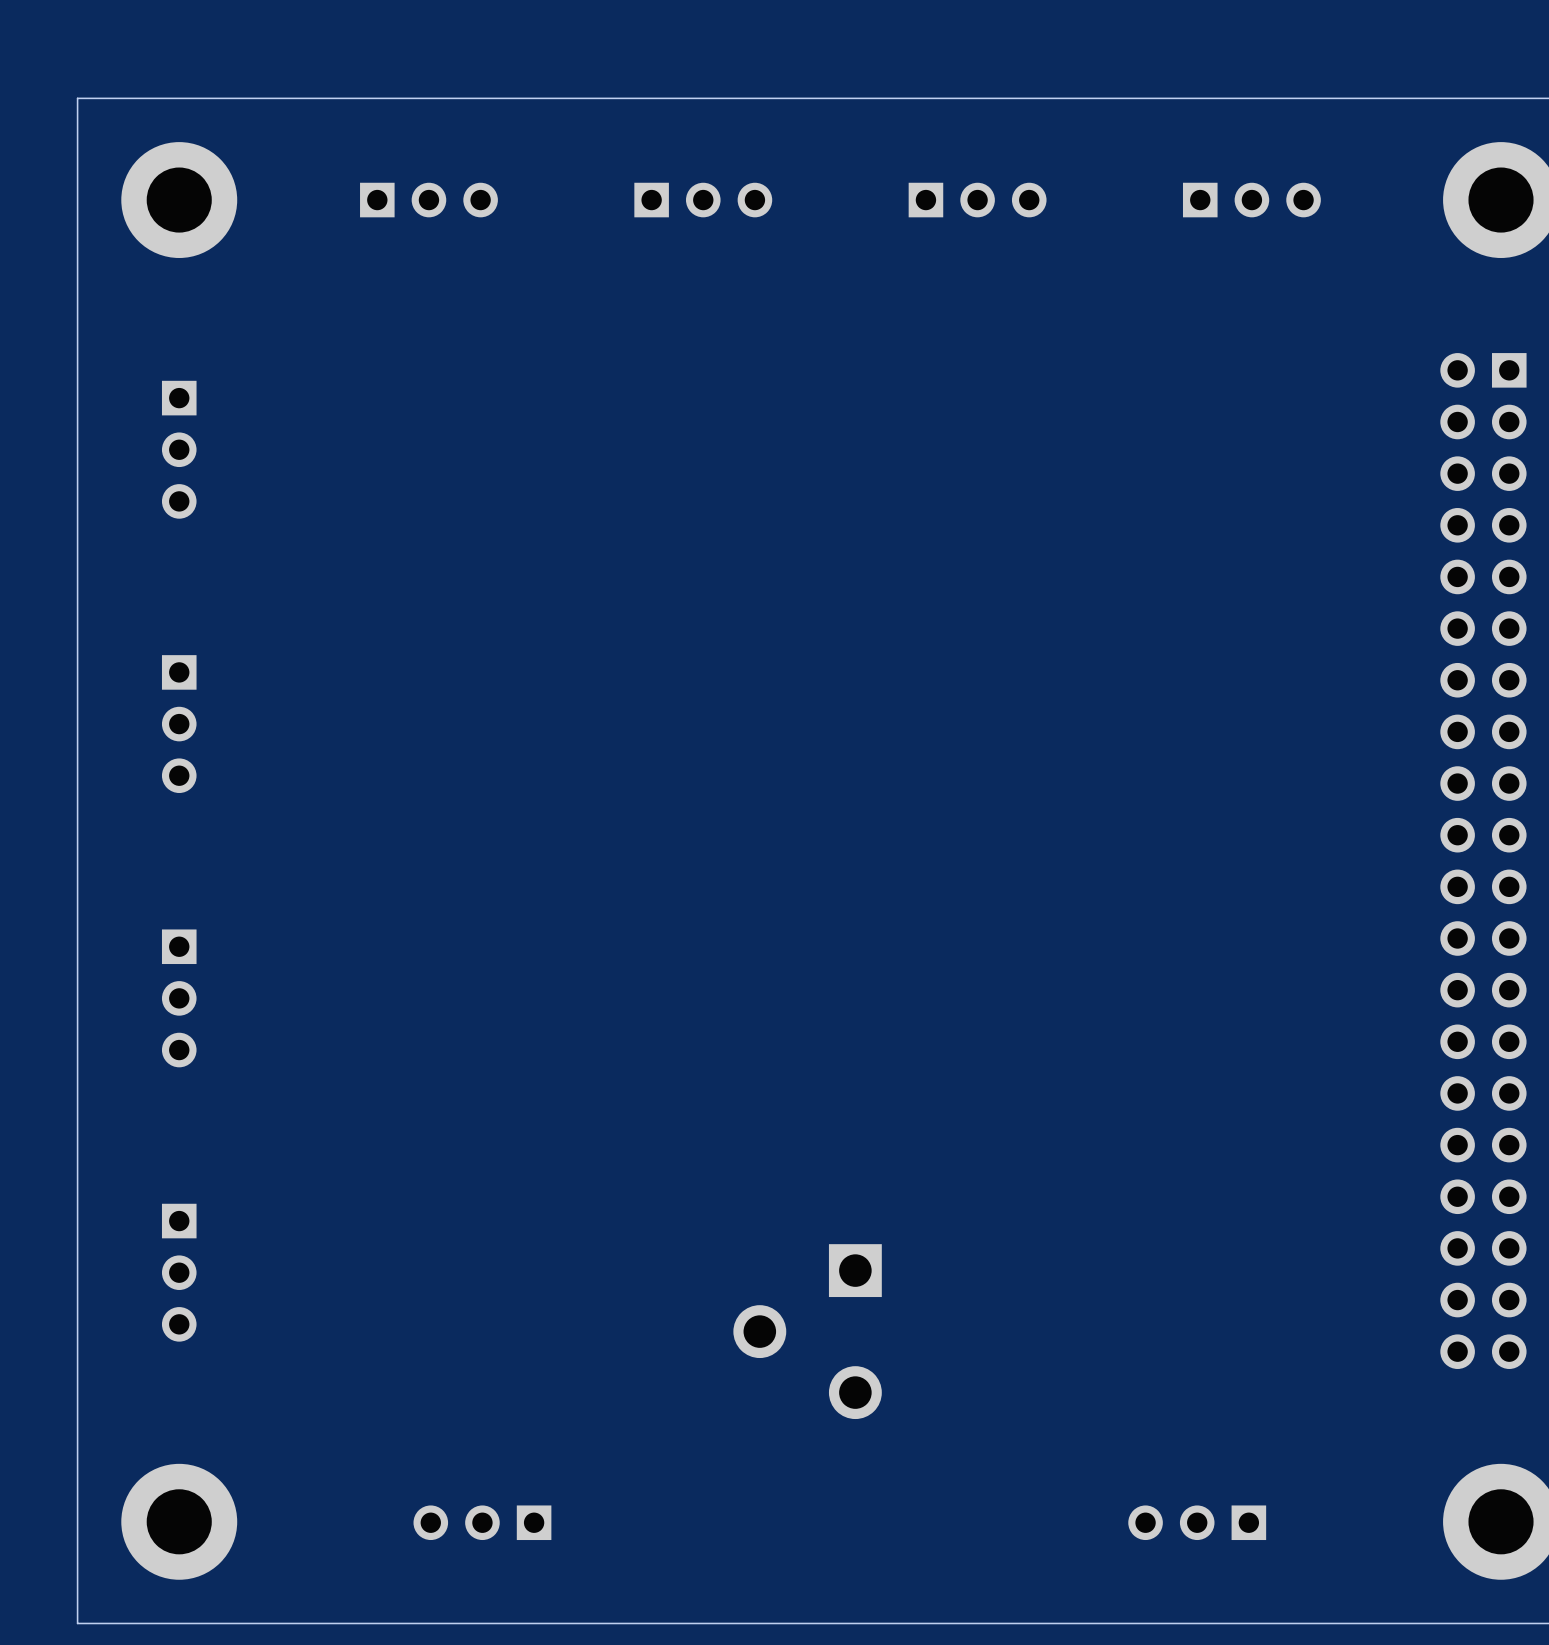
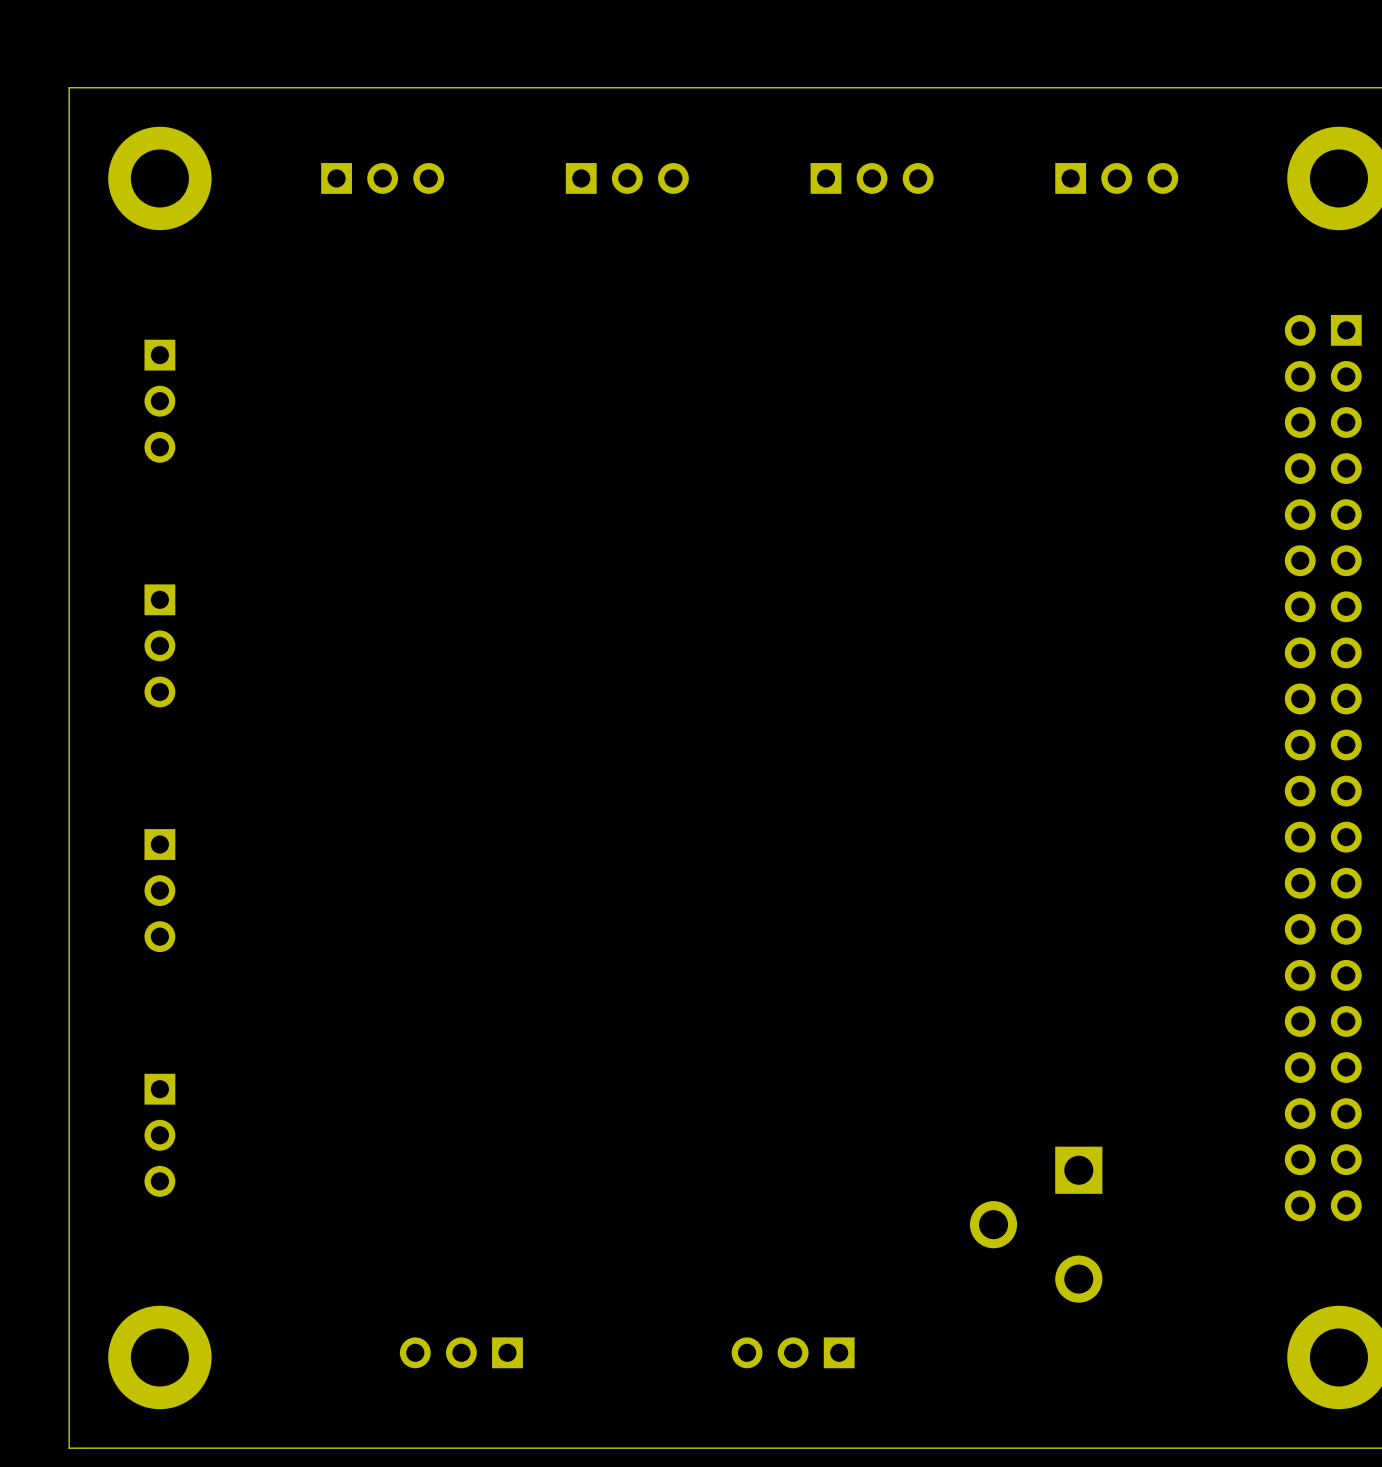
part position: (807, 1331) -> (1036, 1224)
part: none -> (793, 1352)
part position: (482, 1522) -> (461, 1352)
part: (1197, 1522) -> none

